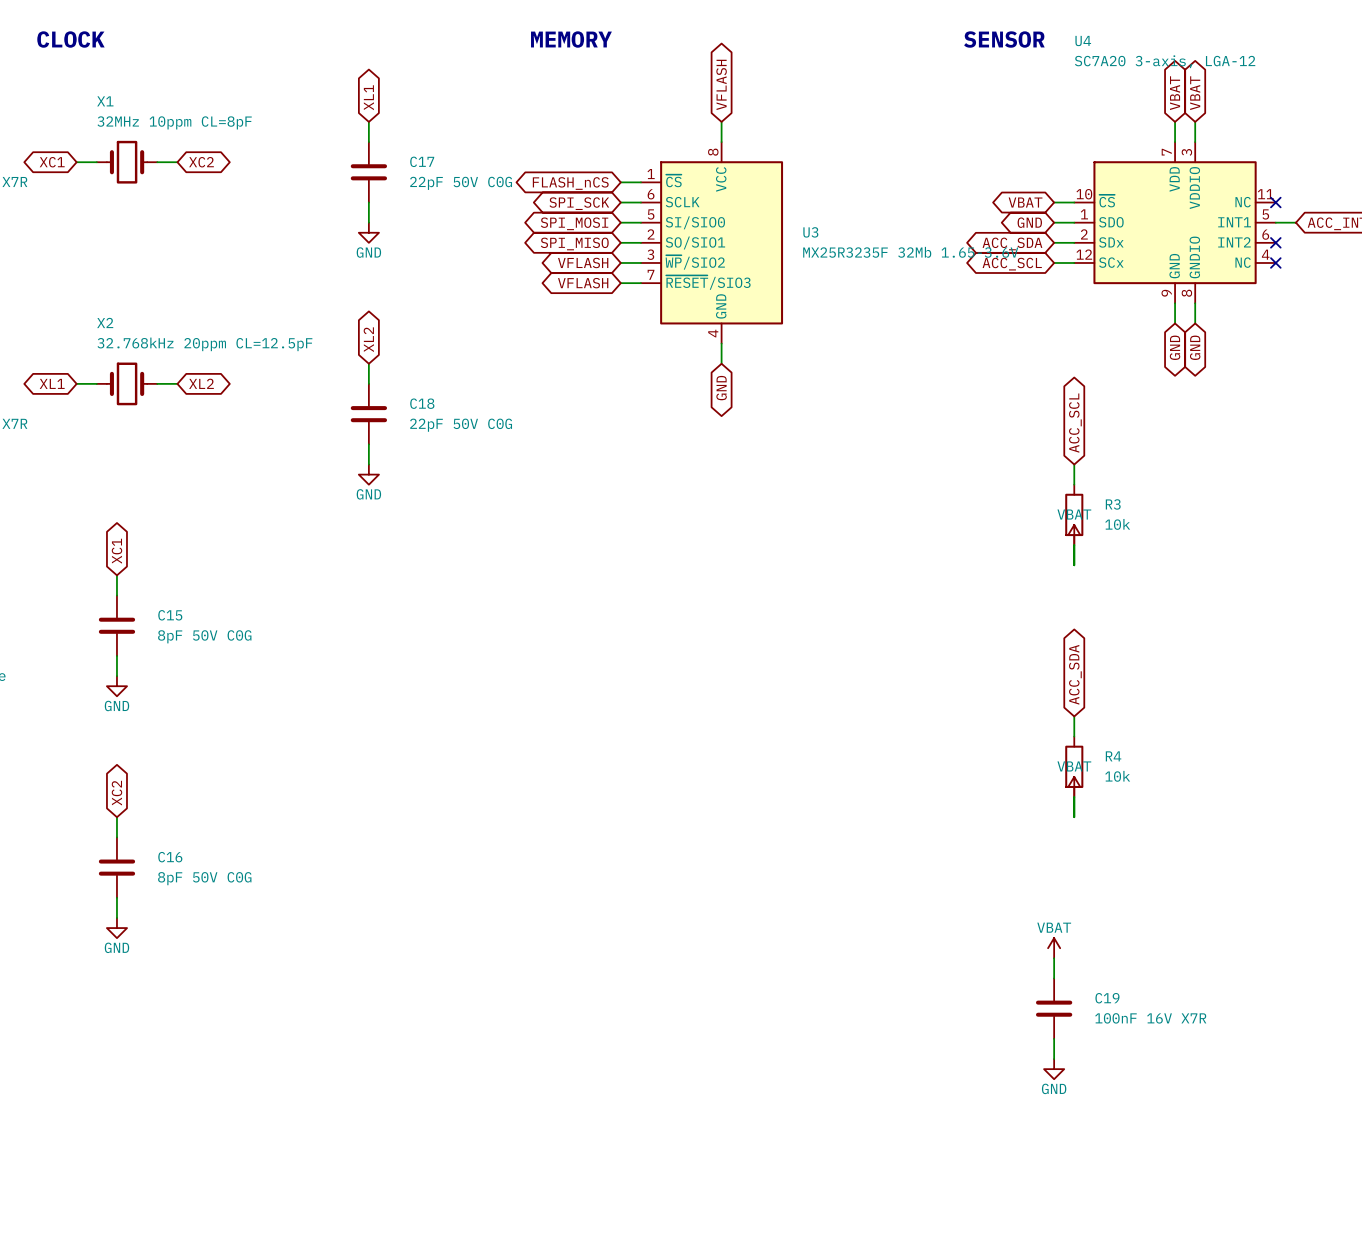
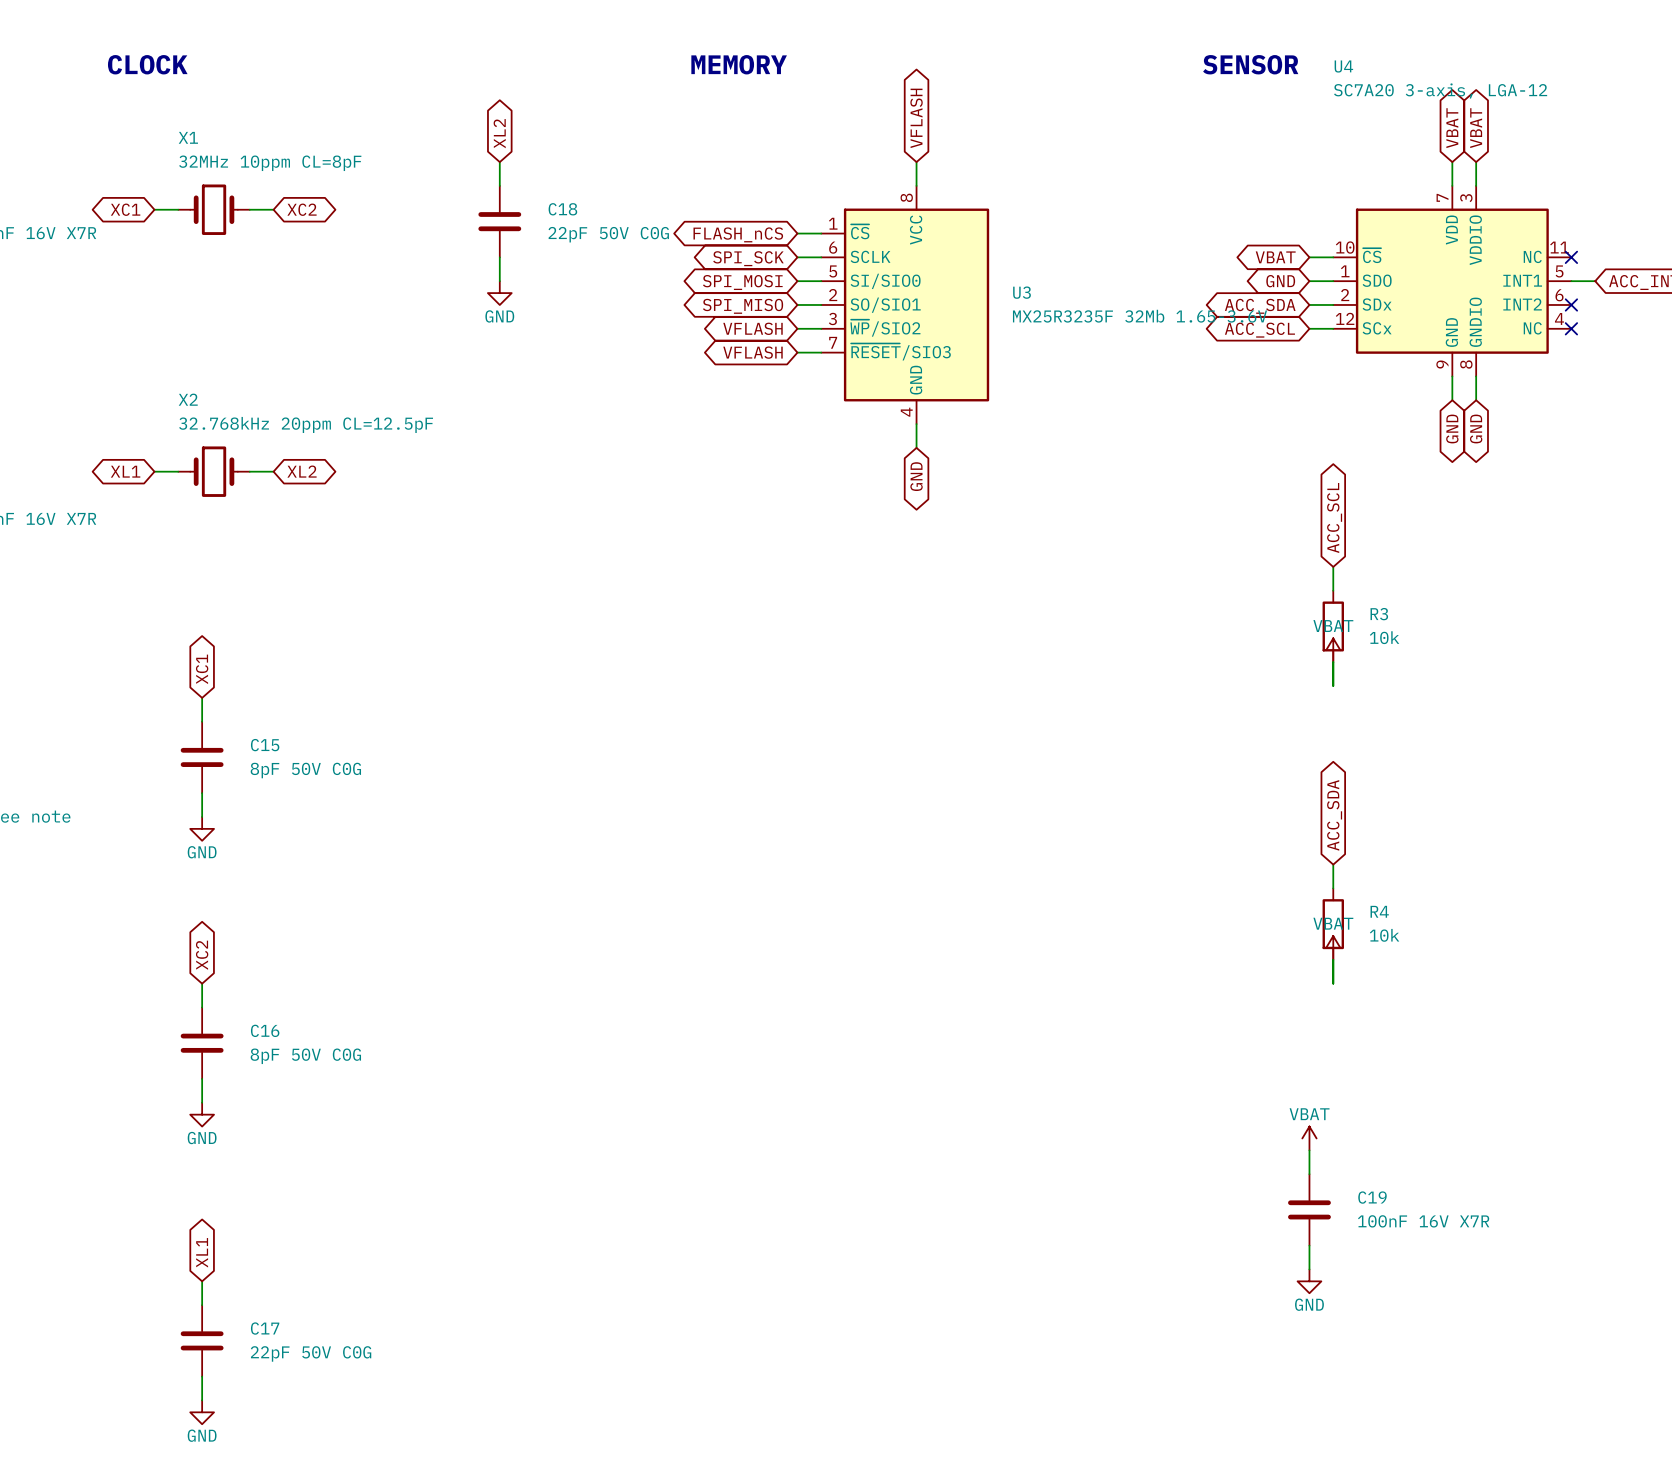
global label: XL1 (368, 97) -> XL2 (499, 133)
C17 name: C17 (422, 161) -> C18 (562, 209)
global label: XL2 (368, 339) -> none
wire: (368, 363) (368, 383) -> none
C18: 22pF 50V C0G (368, 414) -> none
wire: (368, 444) (368, 464) -> none
power symbol: GND (368, 474) -> none
global label: none -> XL1 (202, 1252)
wire: none -> (202, 1281) (202, 1305)
C17: none -> 22pF 50V C0G (202, 1340)
wire: none -> (202, 1376) (202, 1400)
power symbol: none -> GND (202, 1412)

